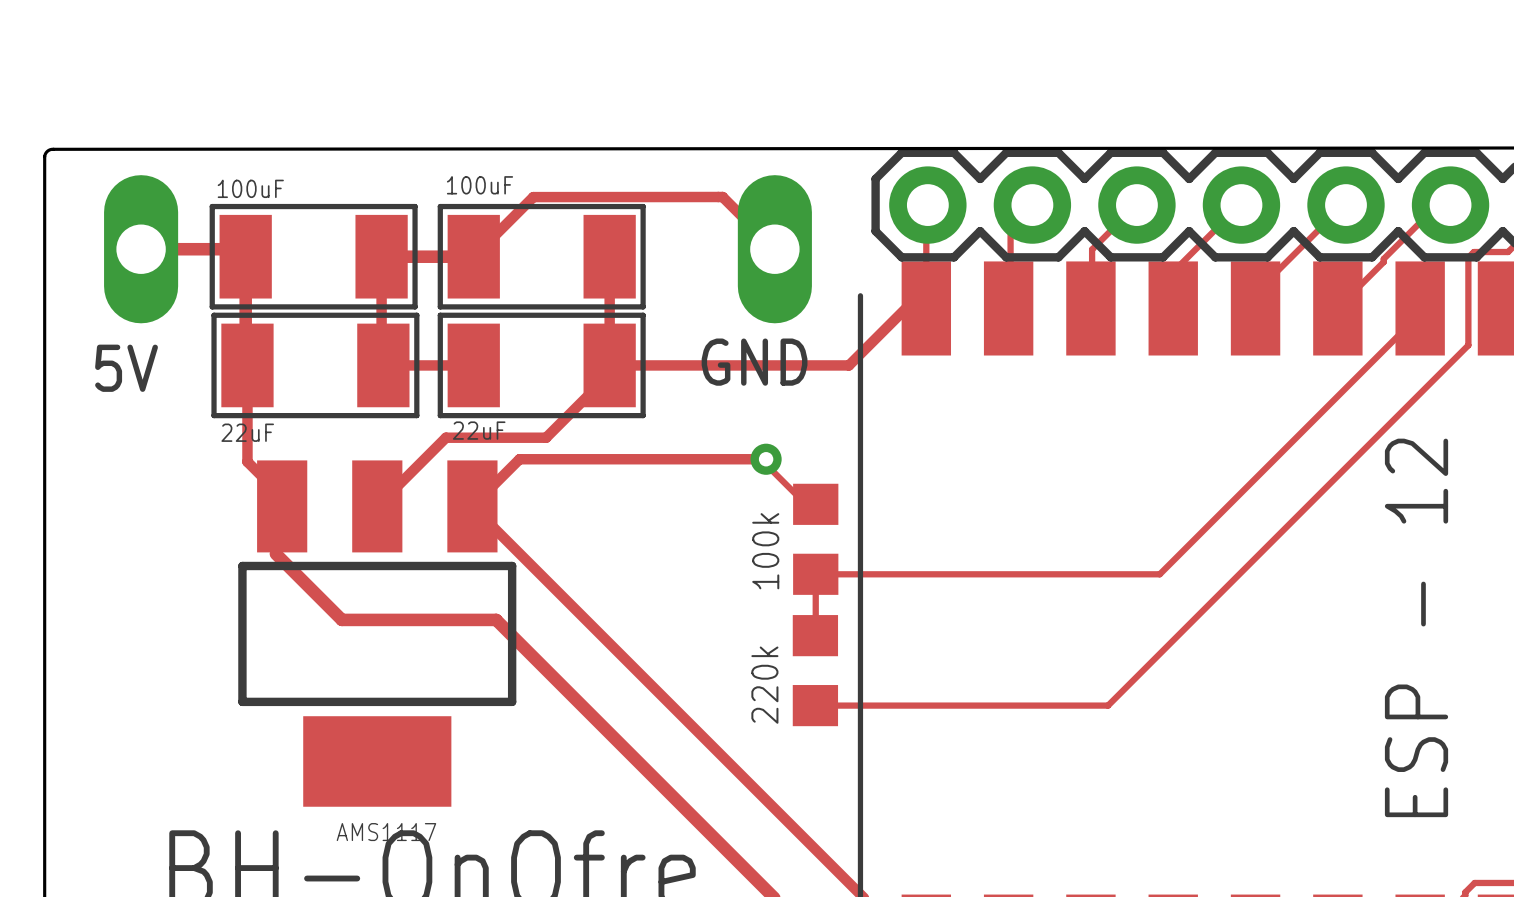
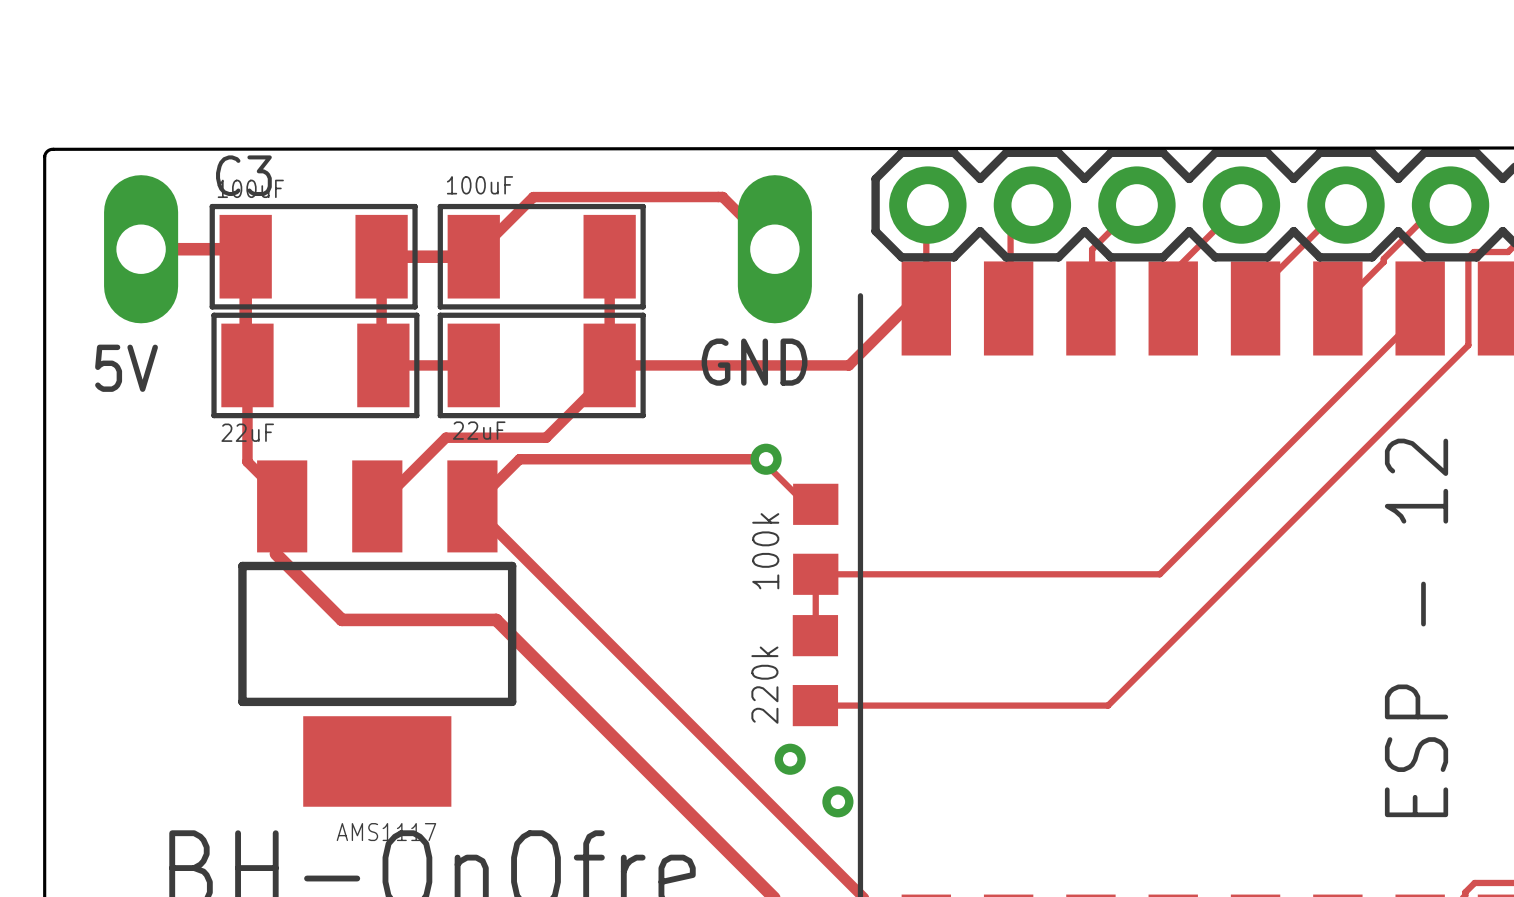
C3 name: none -> C3 (243, 175)
via: none -> (790, 759)
via: none -> (837, 801)

